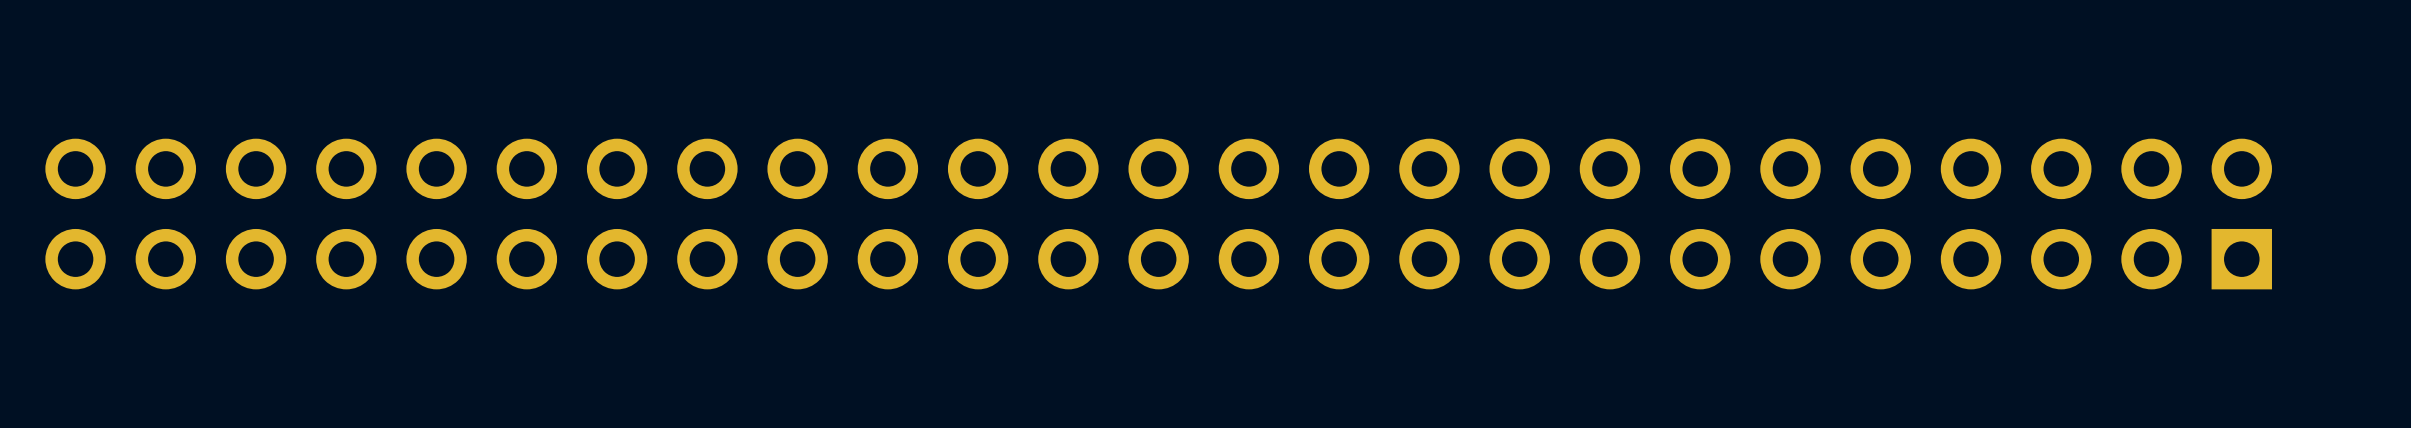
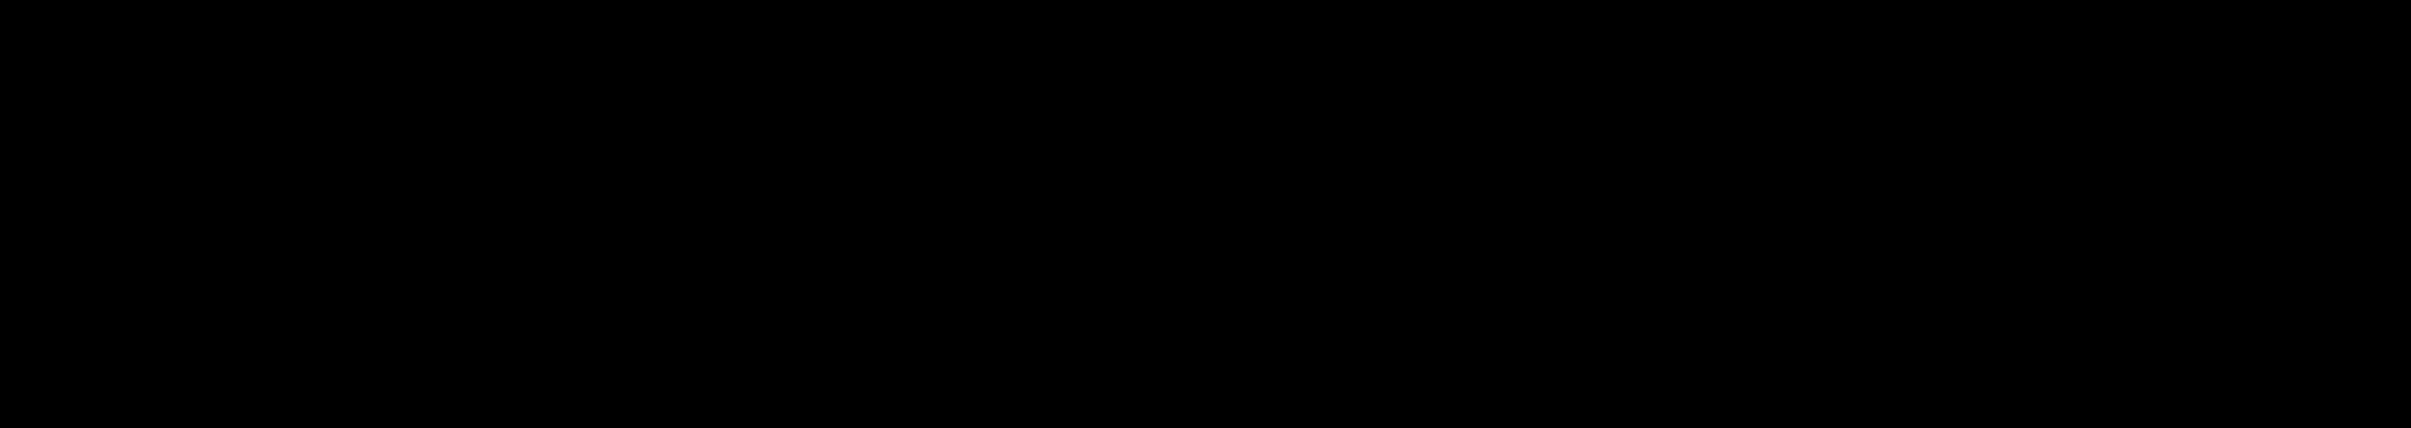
part: (1158, 214) -> none

